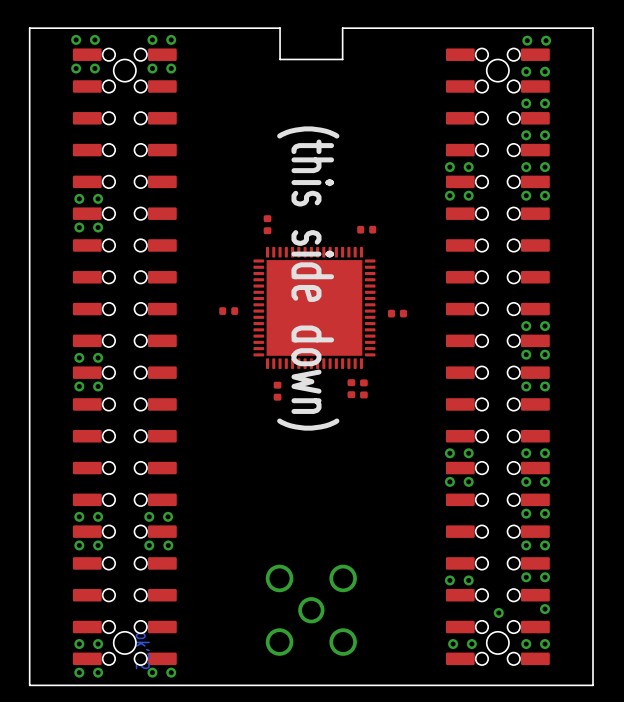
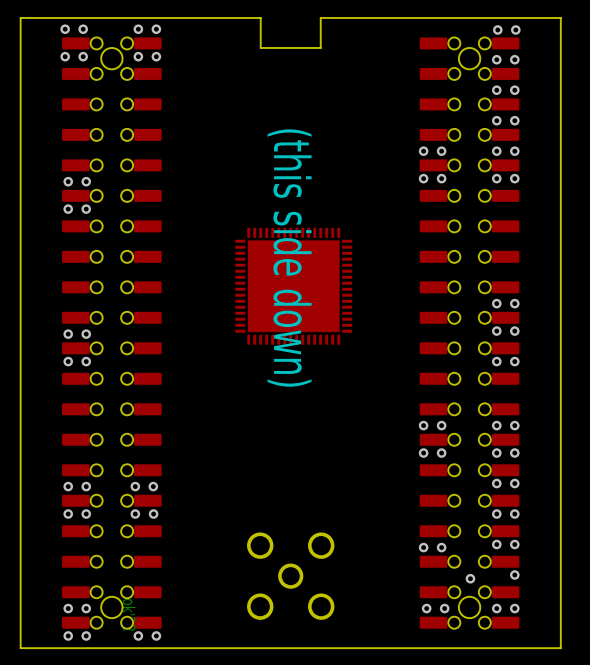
part: (267, 224) -> none
part: (366, 229) -> none
part: (228, 311) -> none
part: (397, 313) -> none
part: (351, 388) -> none
part: (363, 388) -> none
part: (277, 391) -> none

